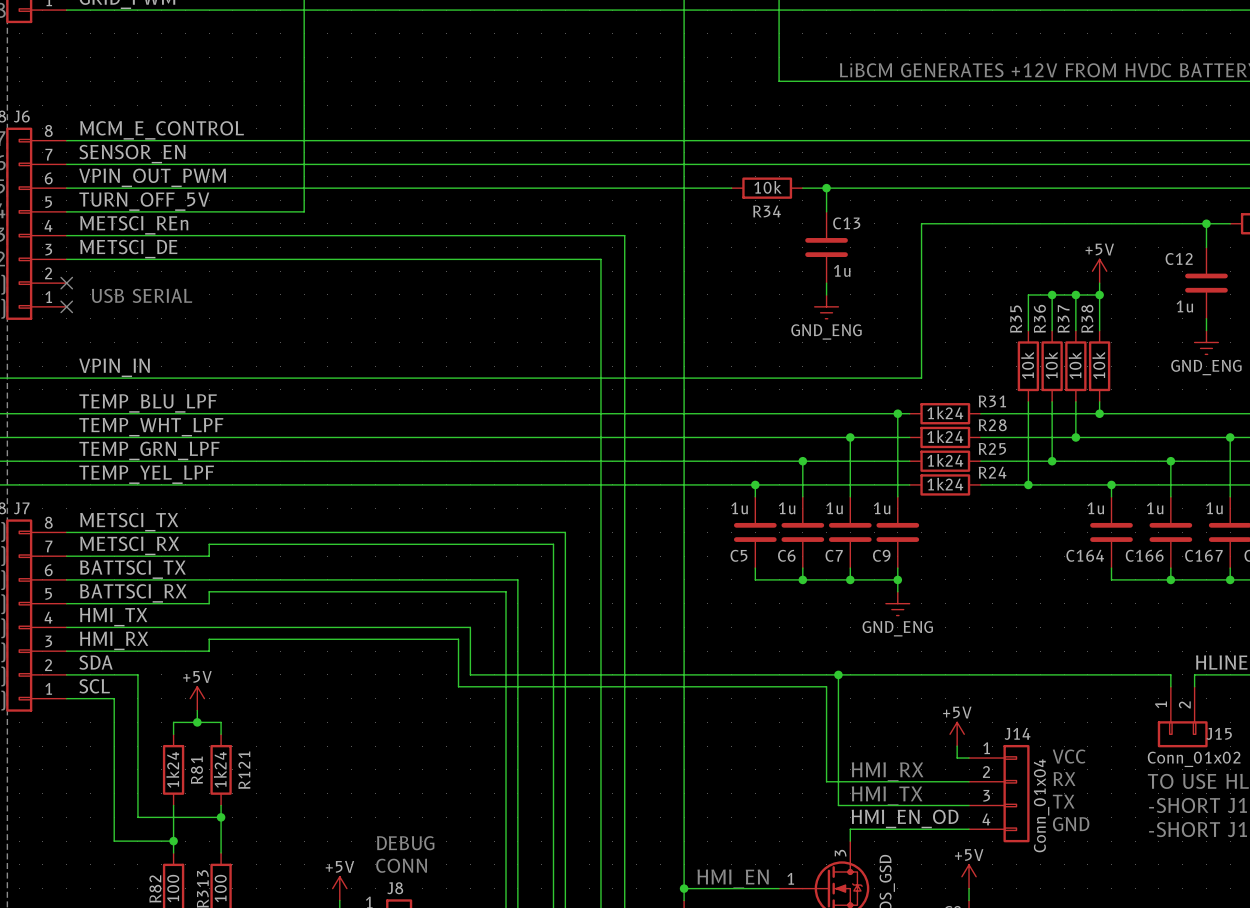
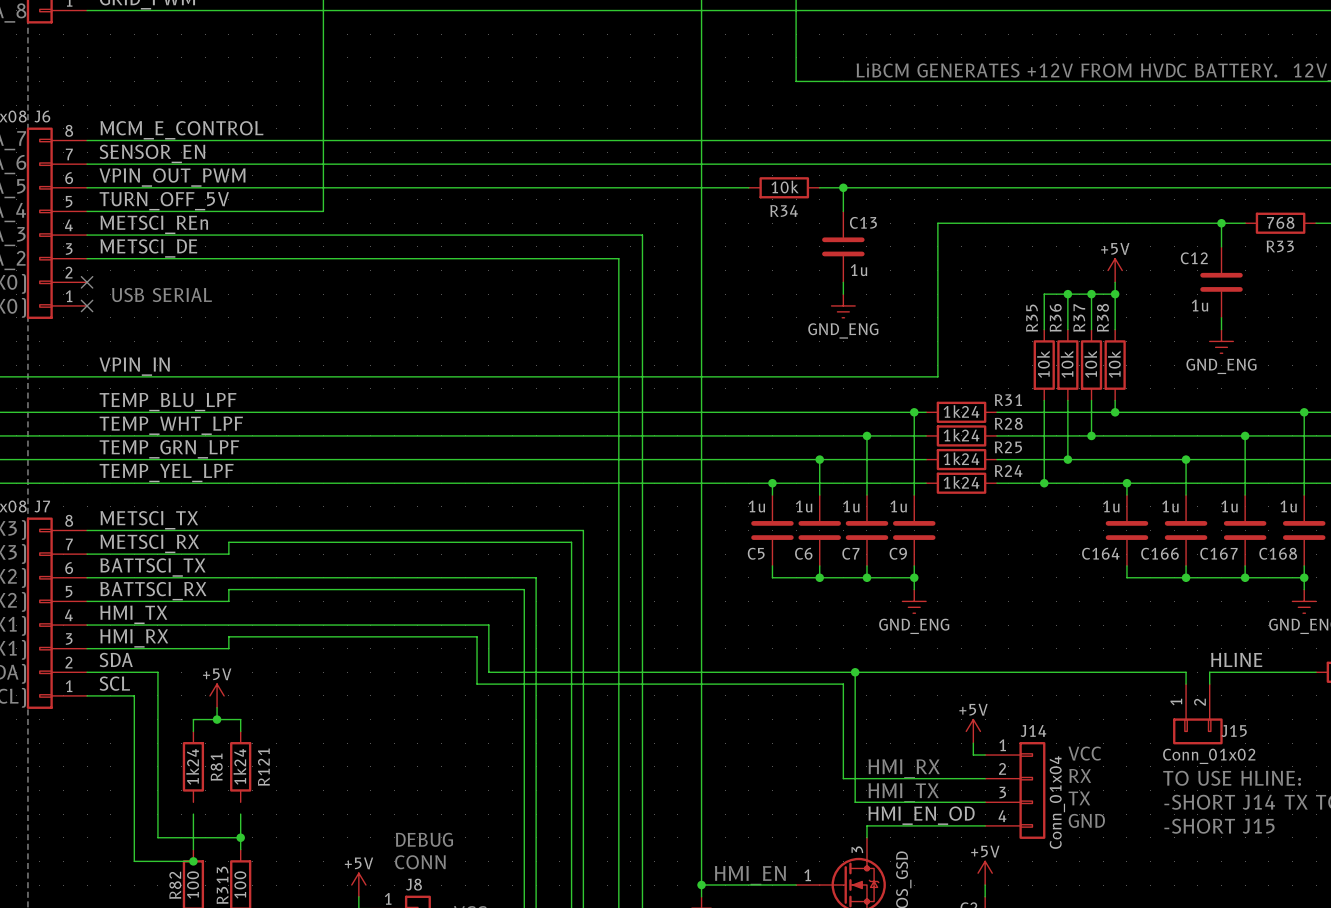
wire: (173, 805) (173, 817) -> none
wire: (221, 805) (221, 817) (137, 817) -> none
junction: (221, 817) -> none
wire: (114, 841) (137, 841) -> (157, 814) (157, 837)
wire: none -> (134, 837) (134, 861) (193, 861)
wire: none -> (193, 837) (240, 837)
junction: (173, 841) -> none
junction: none -> (240, 837)
junction: none -> (193, 861)

